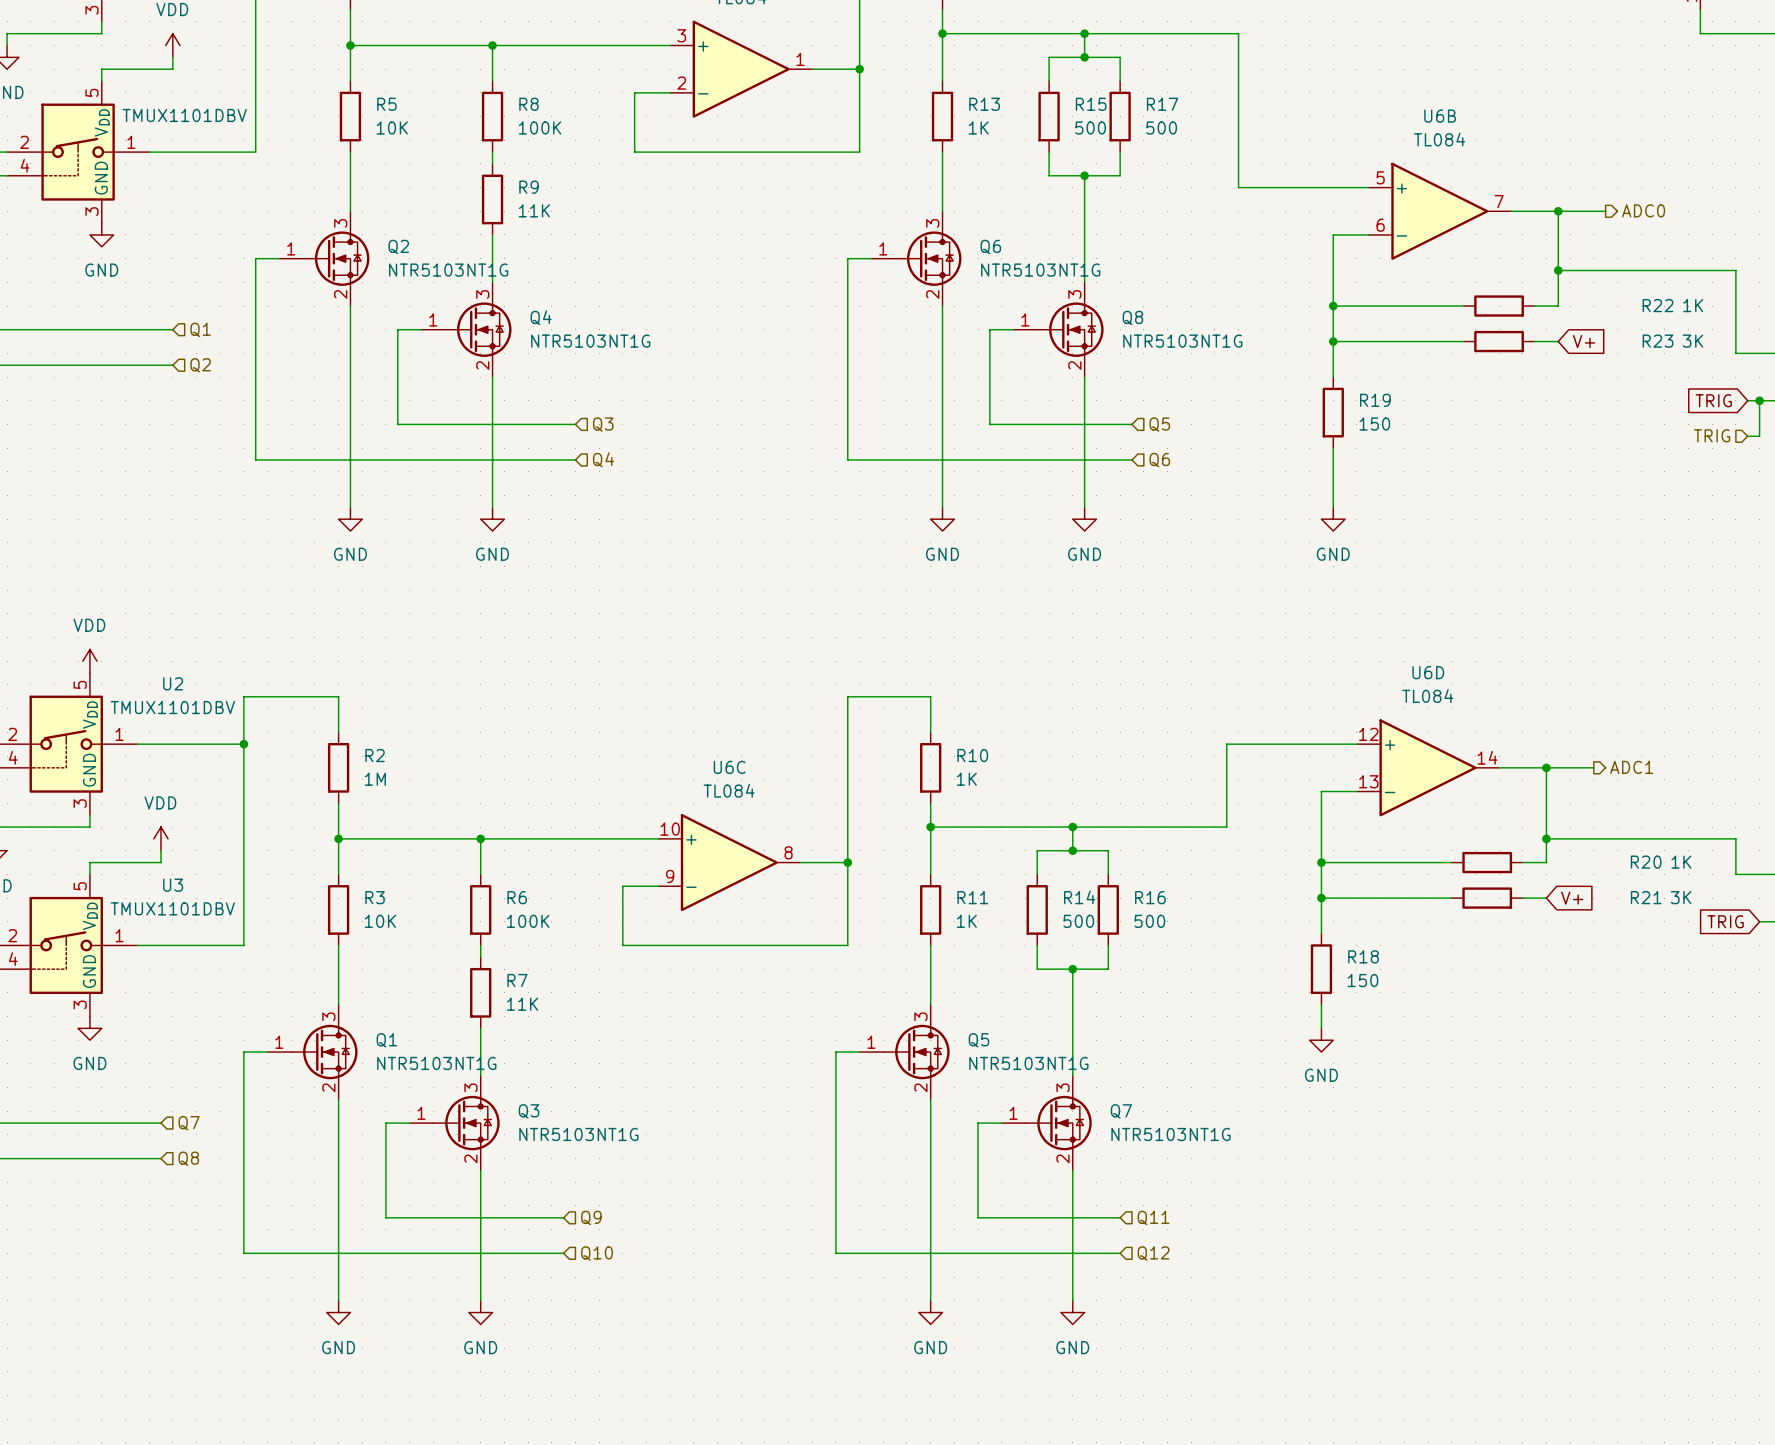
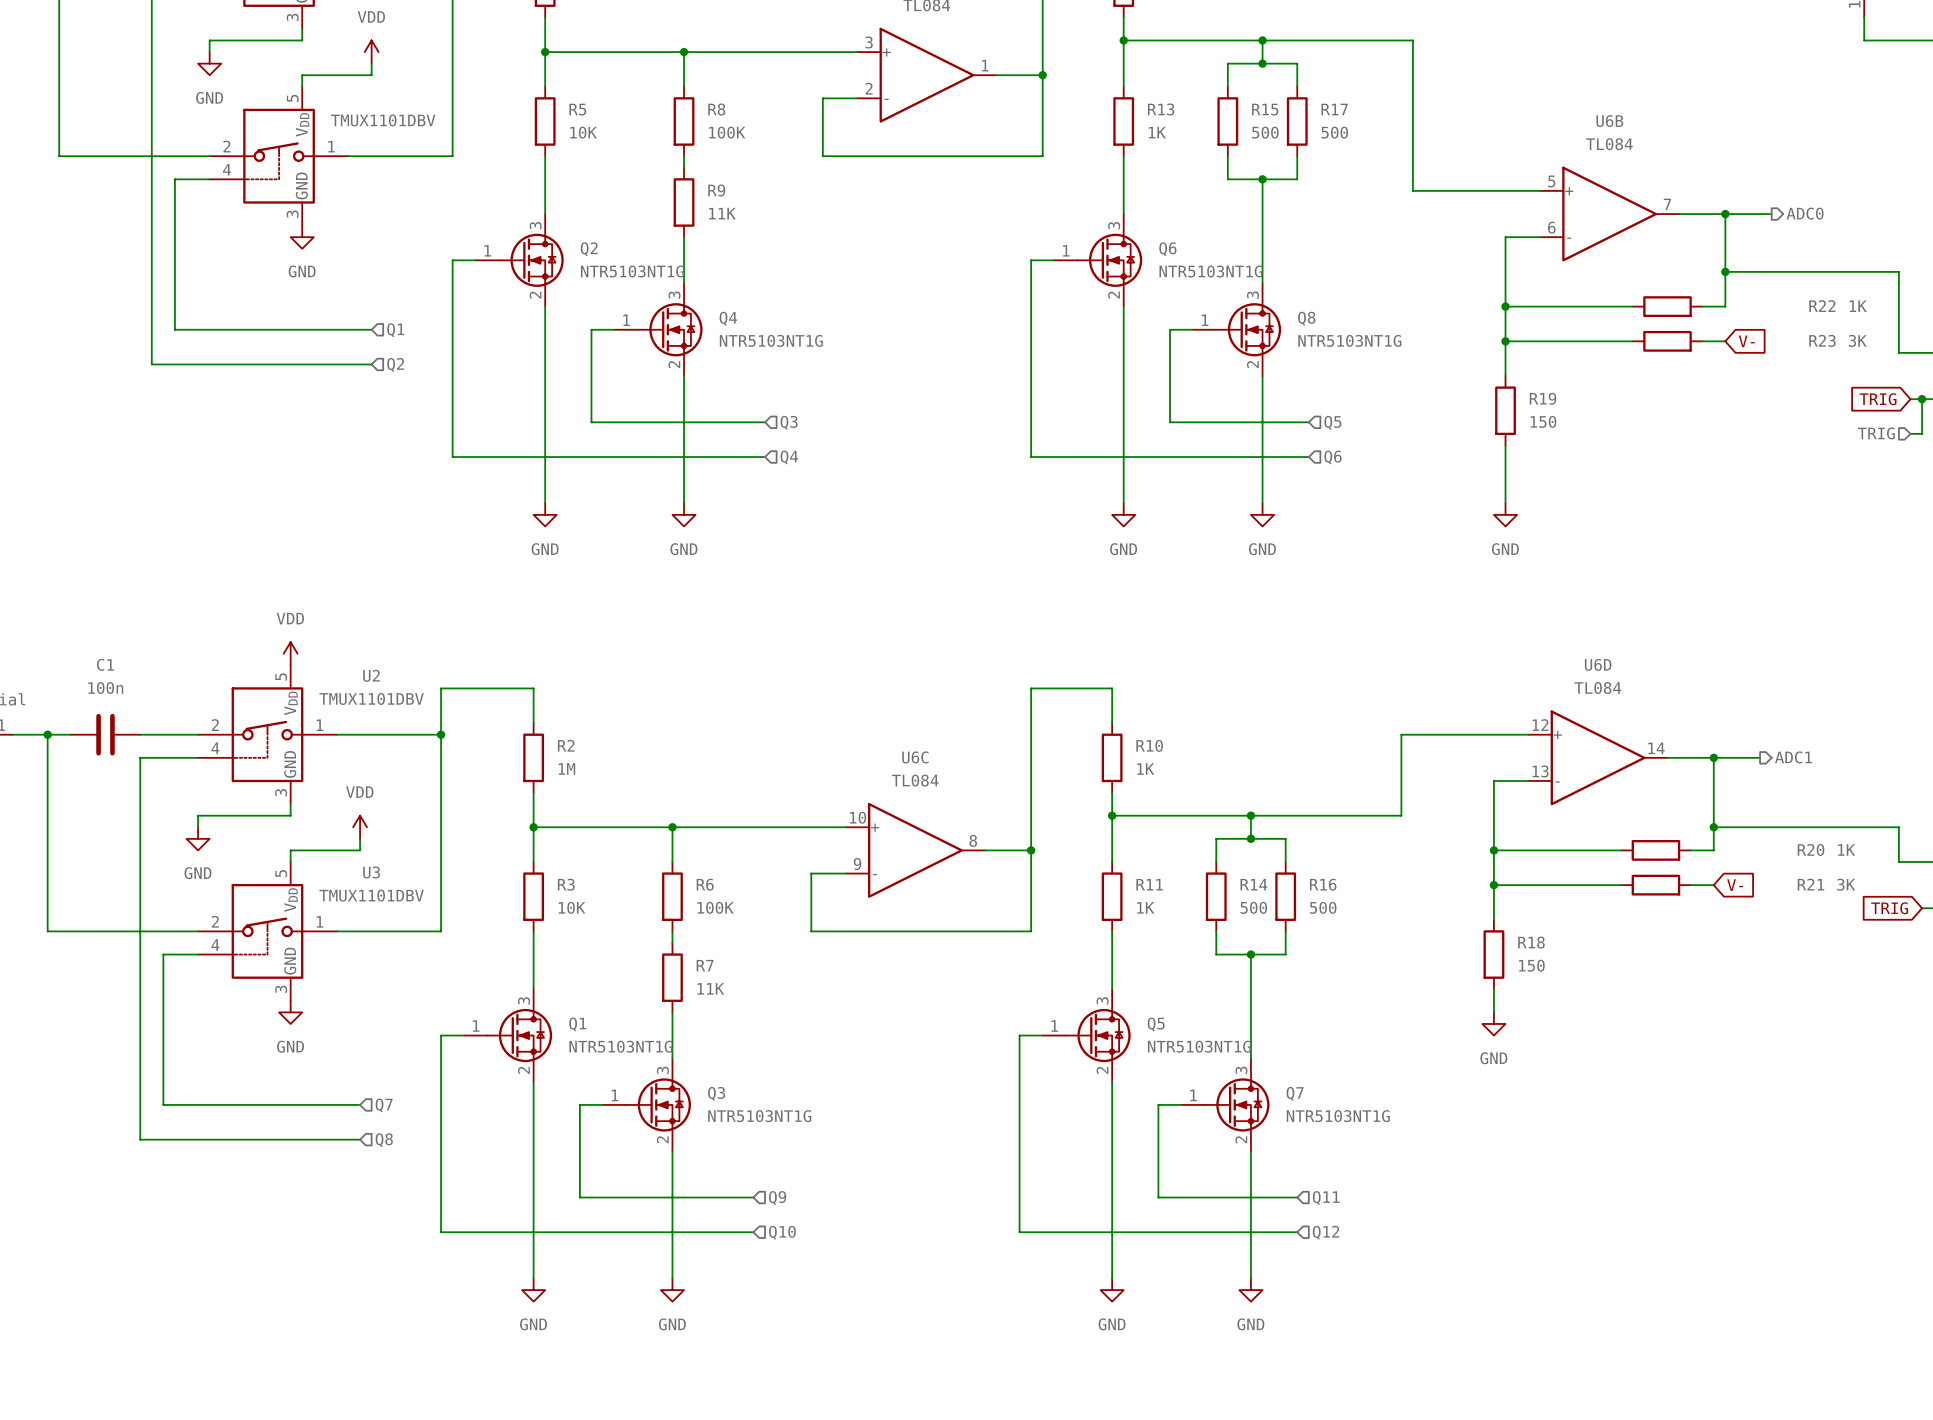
global label: V+ (1584, 341) -> V- (1746, 341)
global label: V+ (1572, 898) -> V- (1735, 885)

